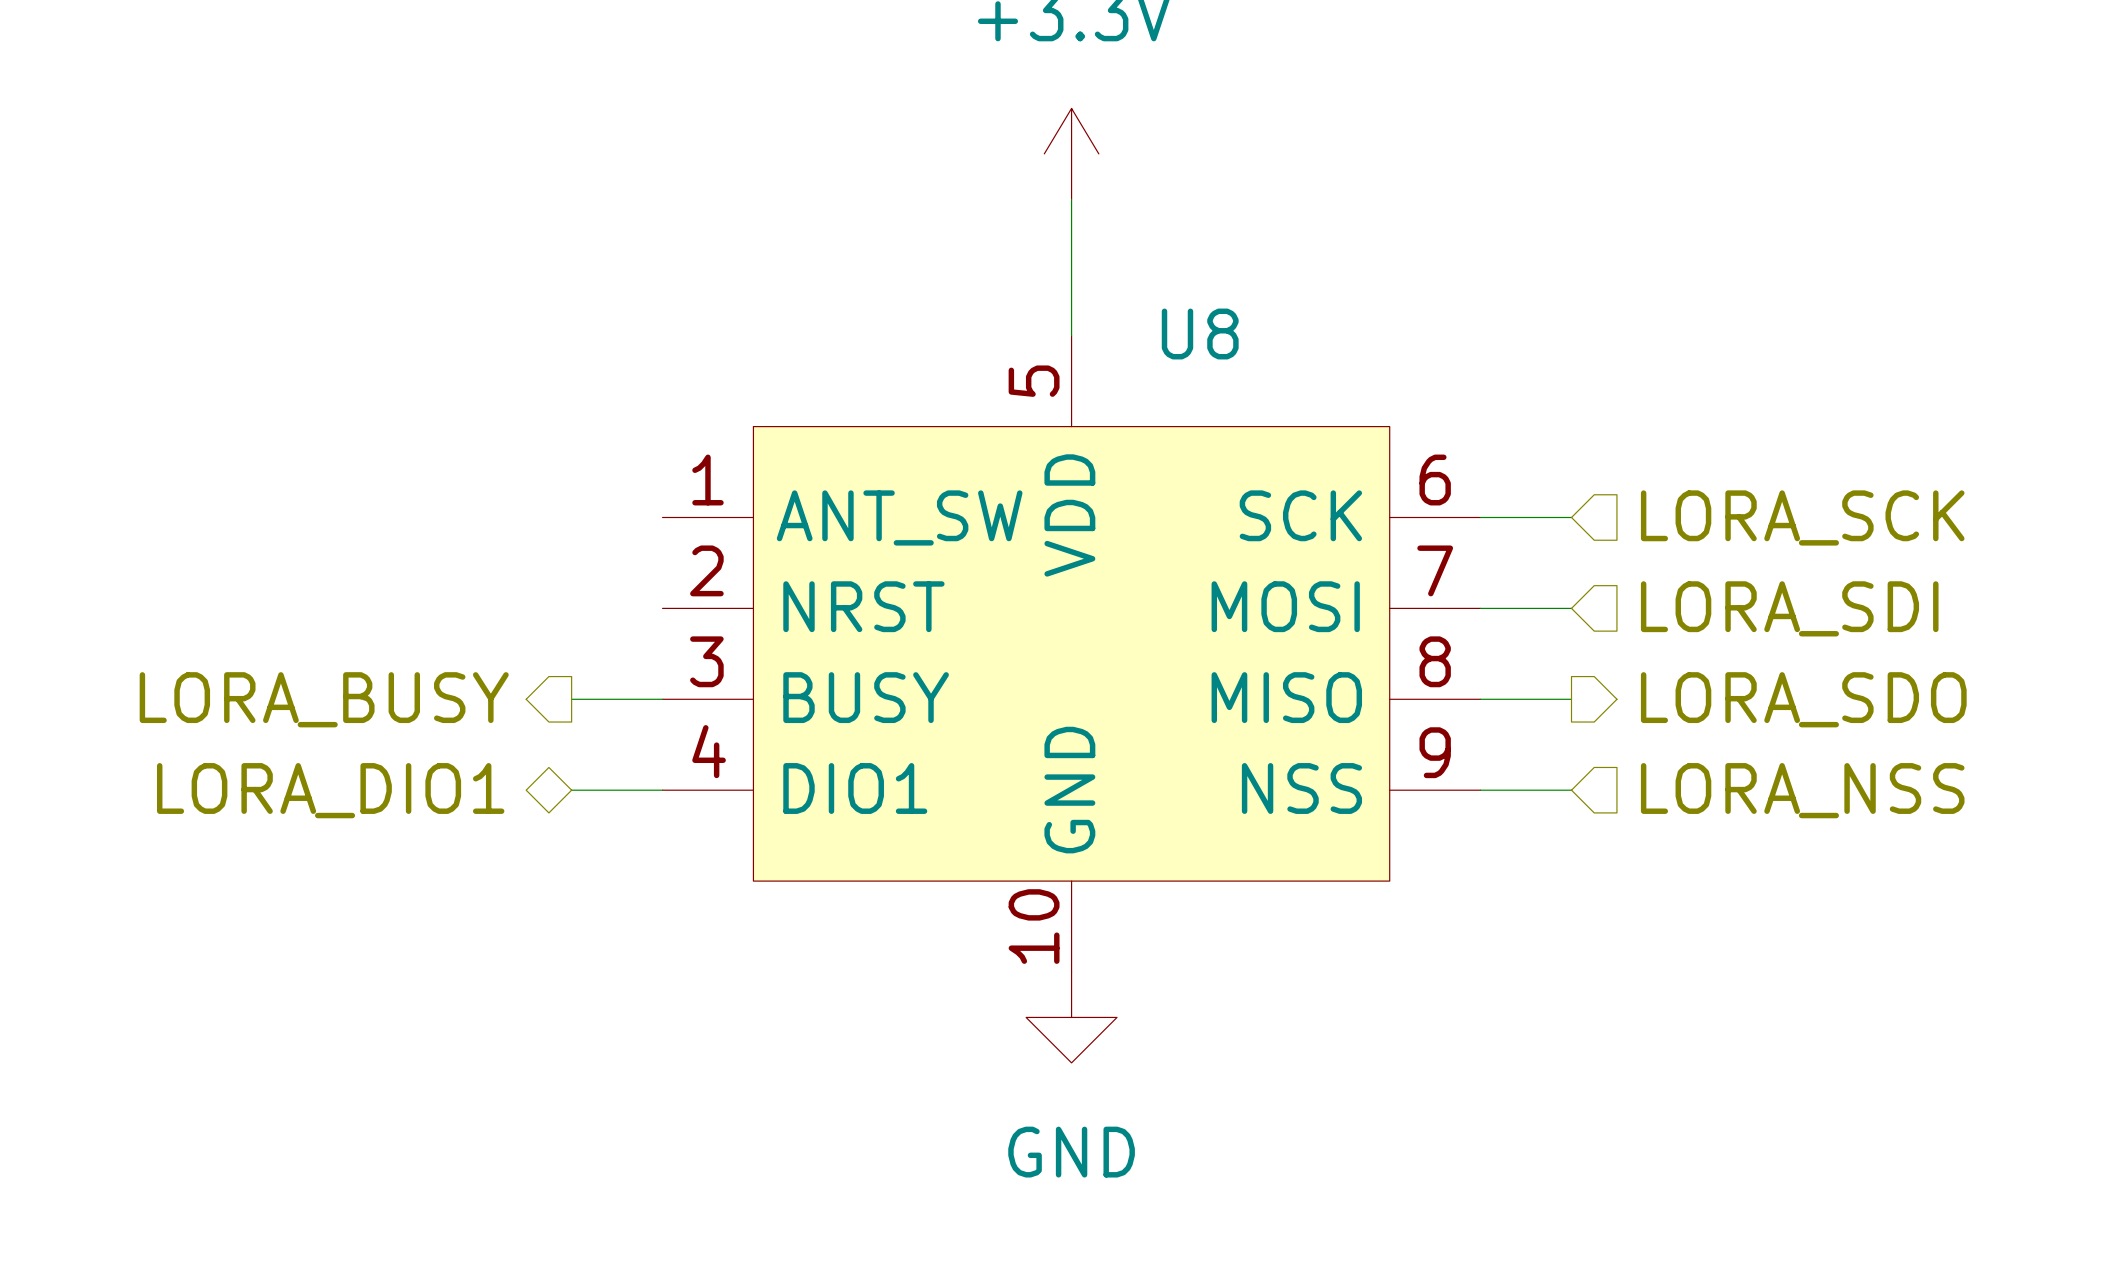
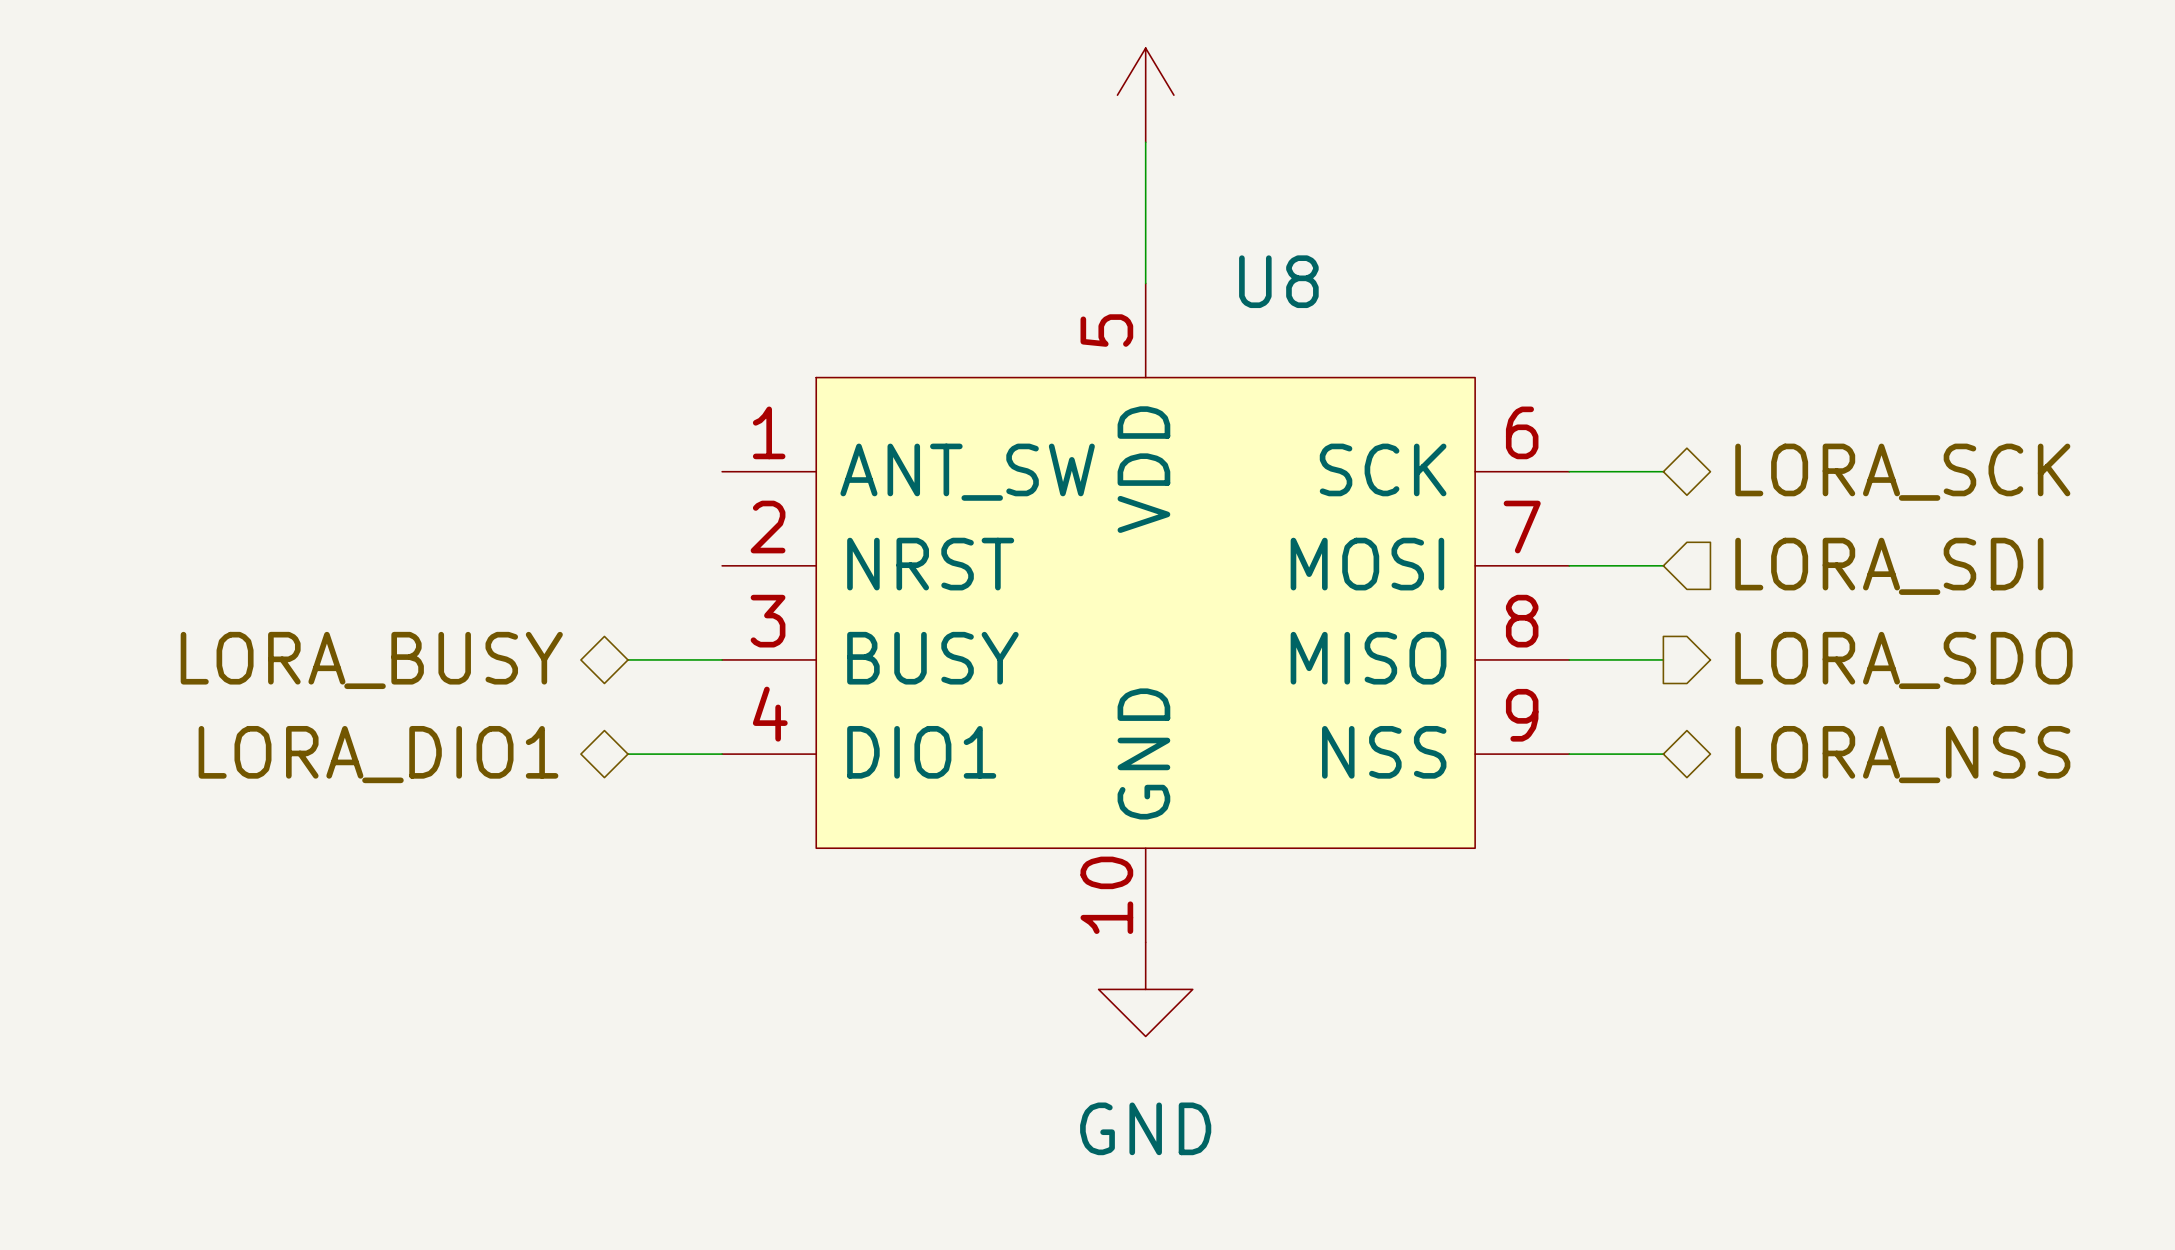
hierarchical label shape: input (1802, 517) -> bidirectional (1902, 472)
hierarchical label shape: output (324, 699) -> bidirectional (371, 660)
hierarchical label shape: input (1802, 790) -> bidirectional (1902, 754)

